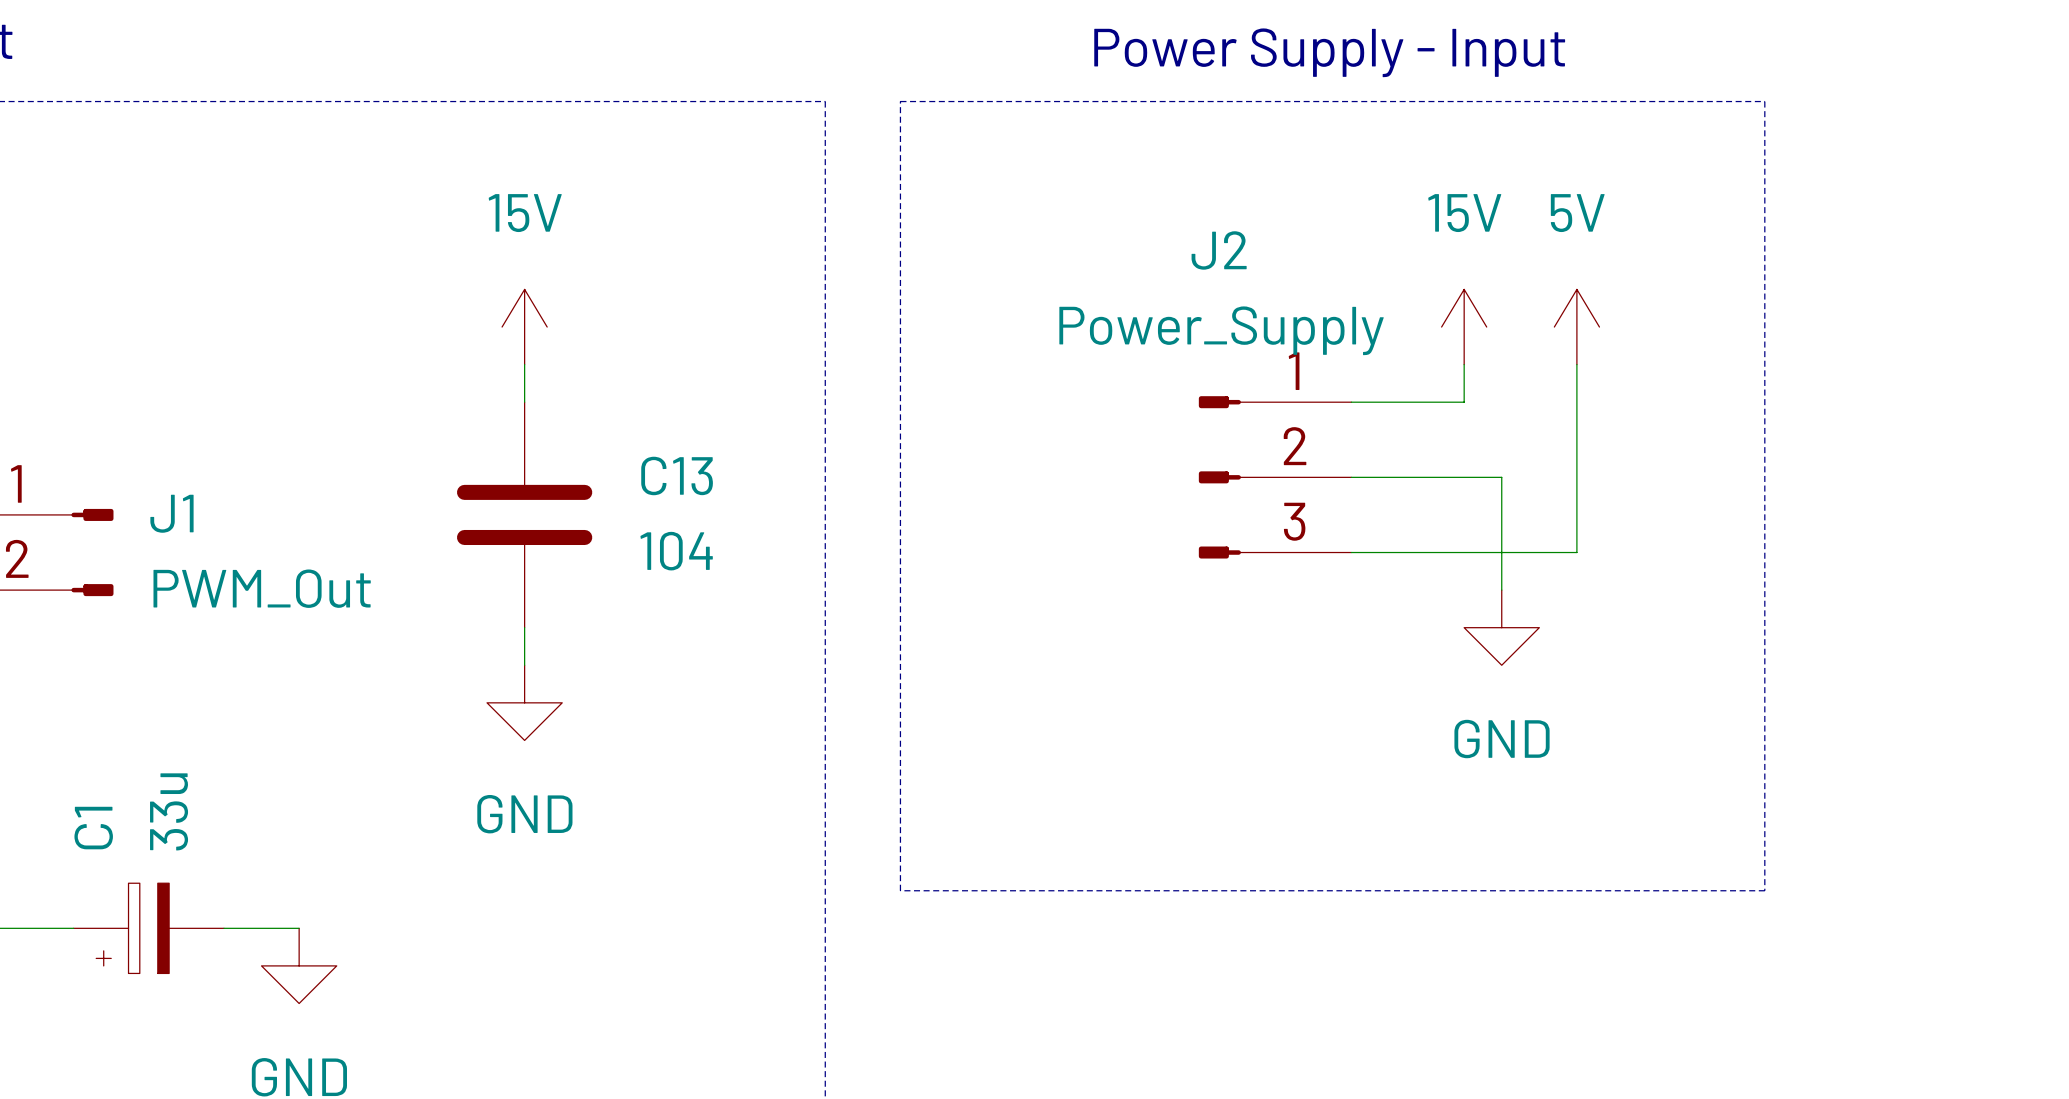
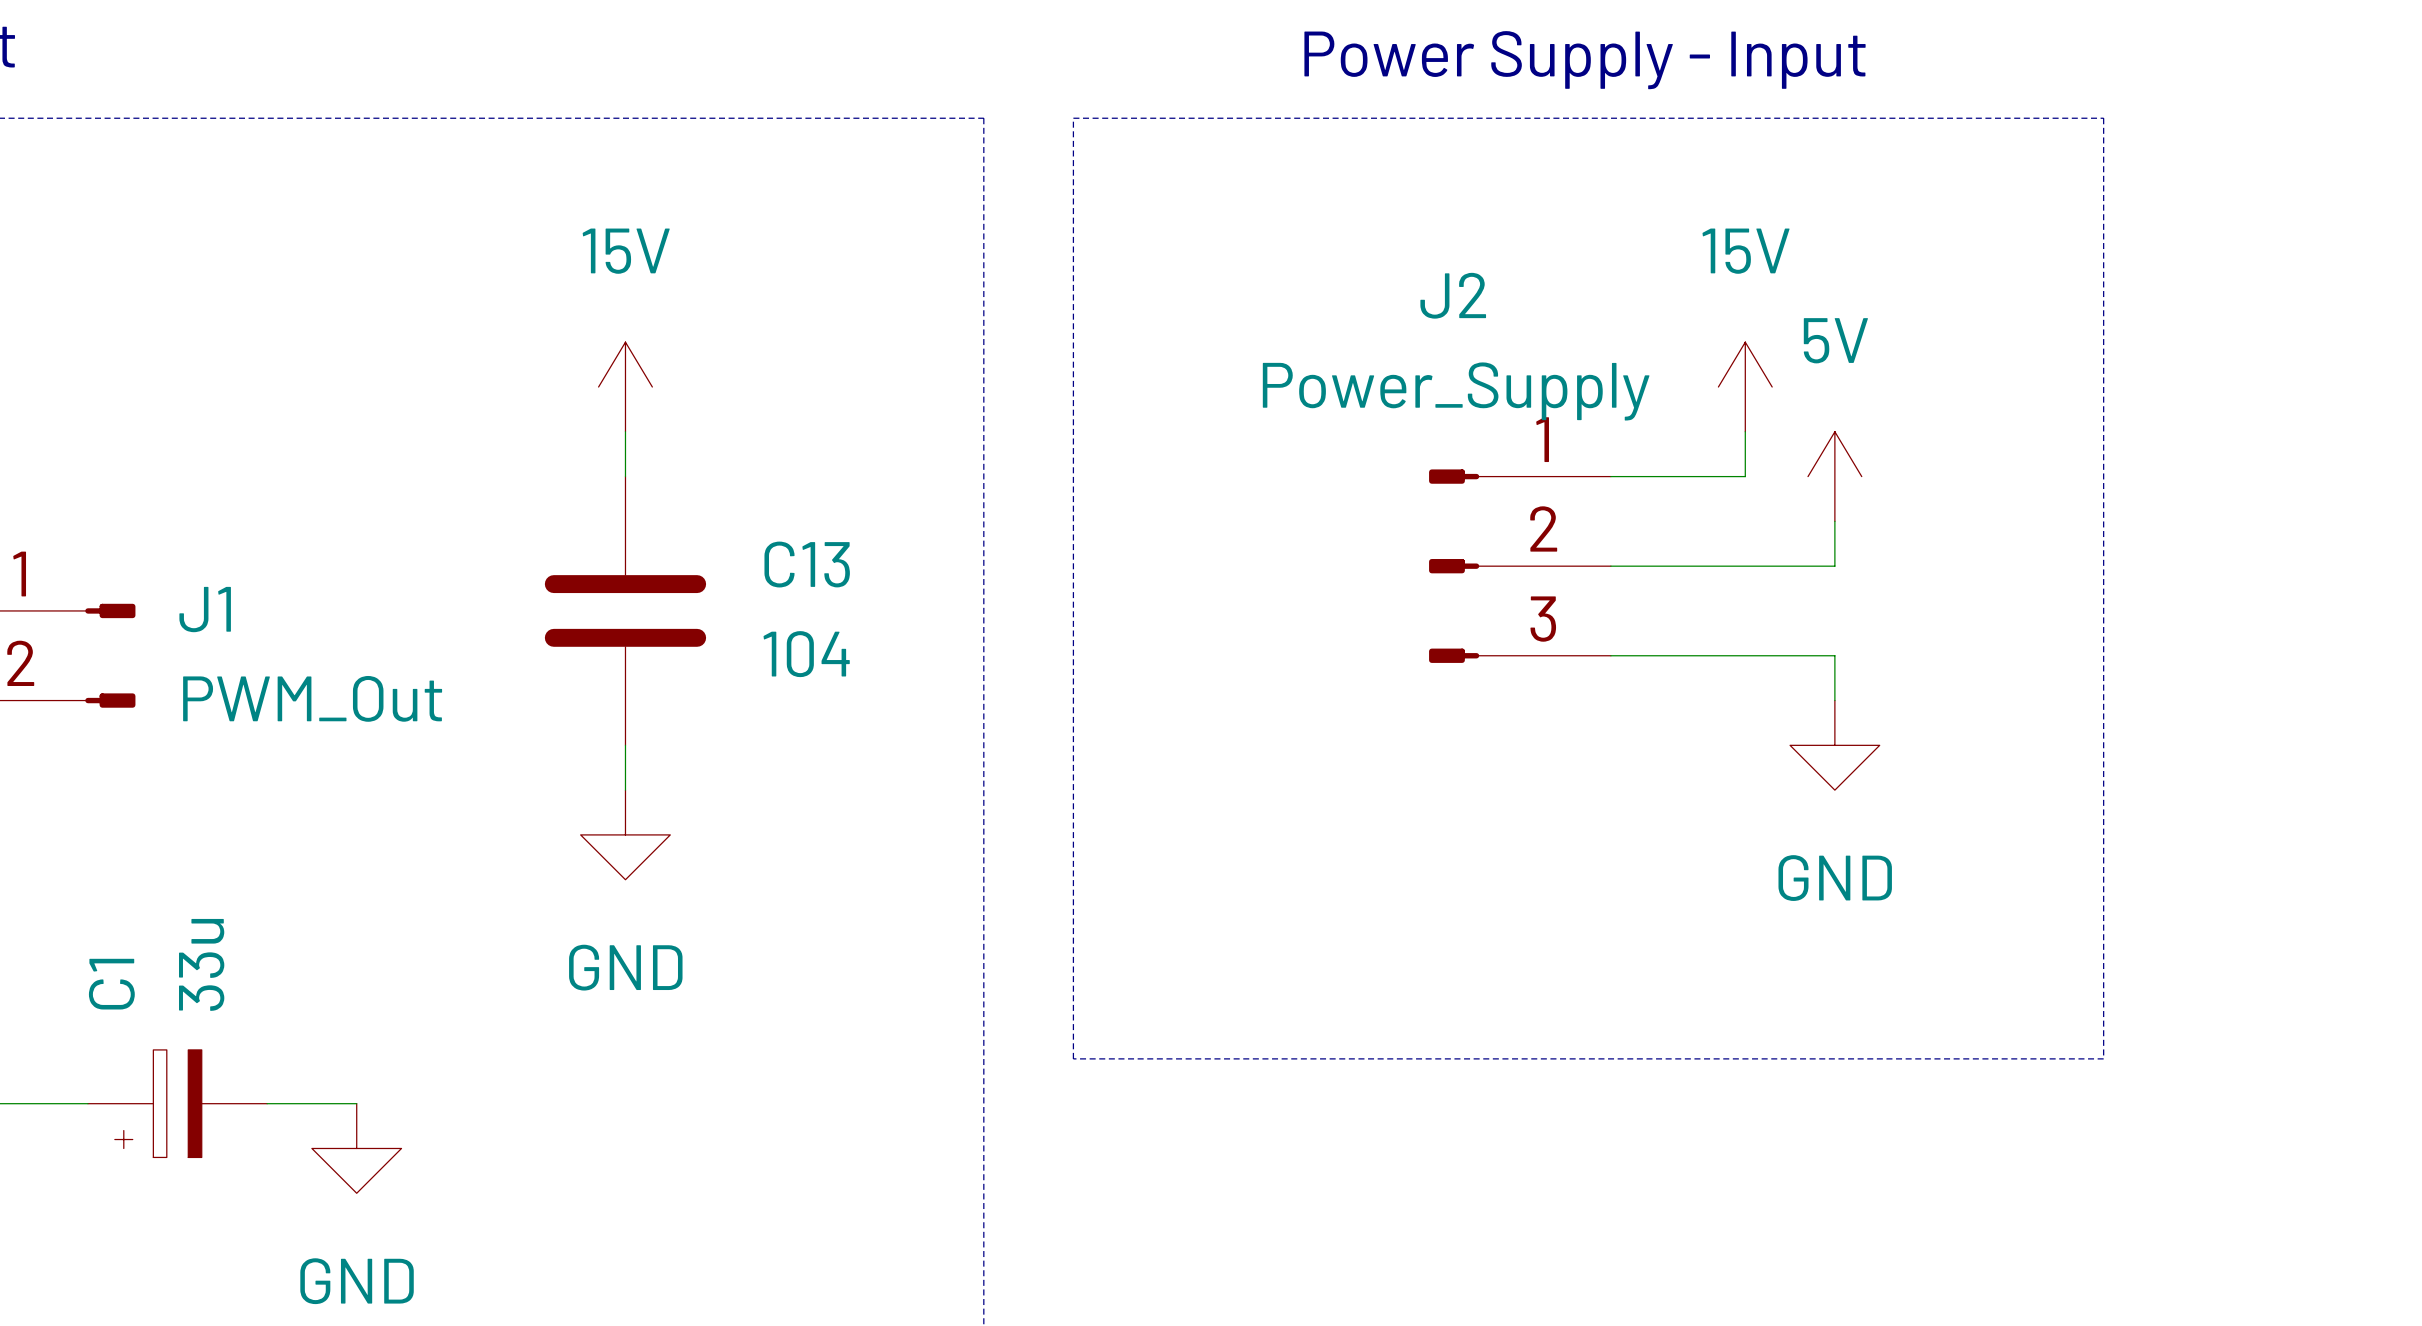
power symbol position: 5V (1576, 327) -> 5V (1834, 476)
wire: (1576, 364) (1576, 552) (1539, 552) -> (1834, 700) (1834, 655)
wire: (1501, 477) (1501, 590) -> (1790, 566) (1834, 566) (1834, 521)
power symbol position: GND (1501, 627) -> GND (1834, 745)

